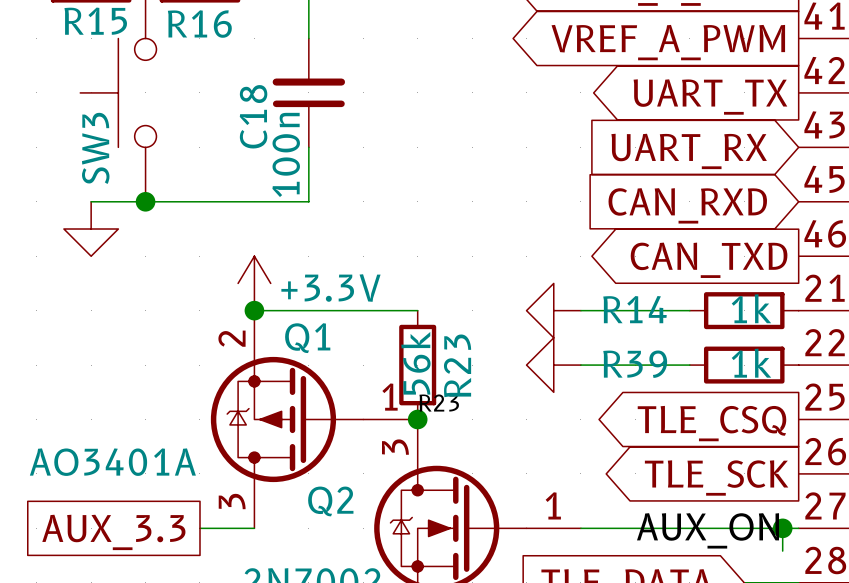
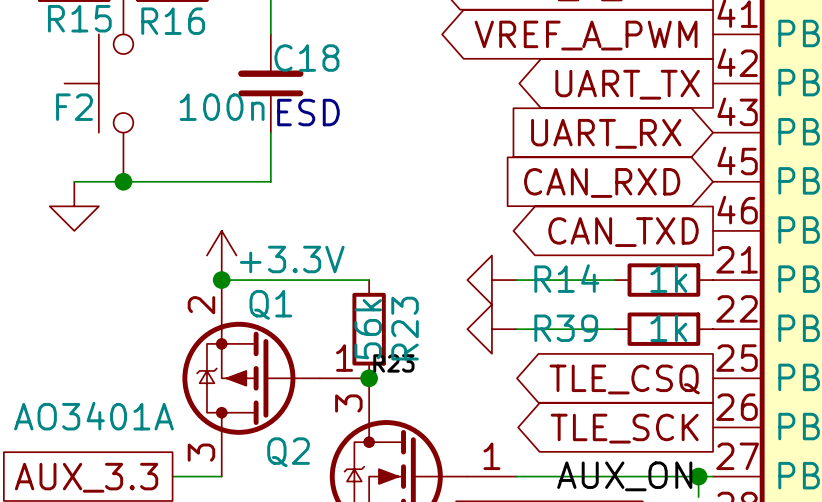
C18 name rotation: 0° (253, 116) -> 90° clockwise (306, 58)
C18 name position: C18 (253, 116) -> C18 (306, 58)
text: none -> ESD (308, 112)
SW3 name: SW3 (95, 148) -> F2 (74, 107)
C18 value rotation: 0° (286, 154) -> 90° clockwise (222, 107)

